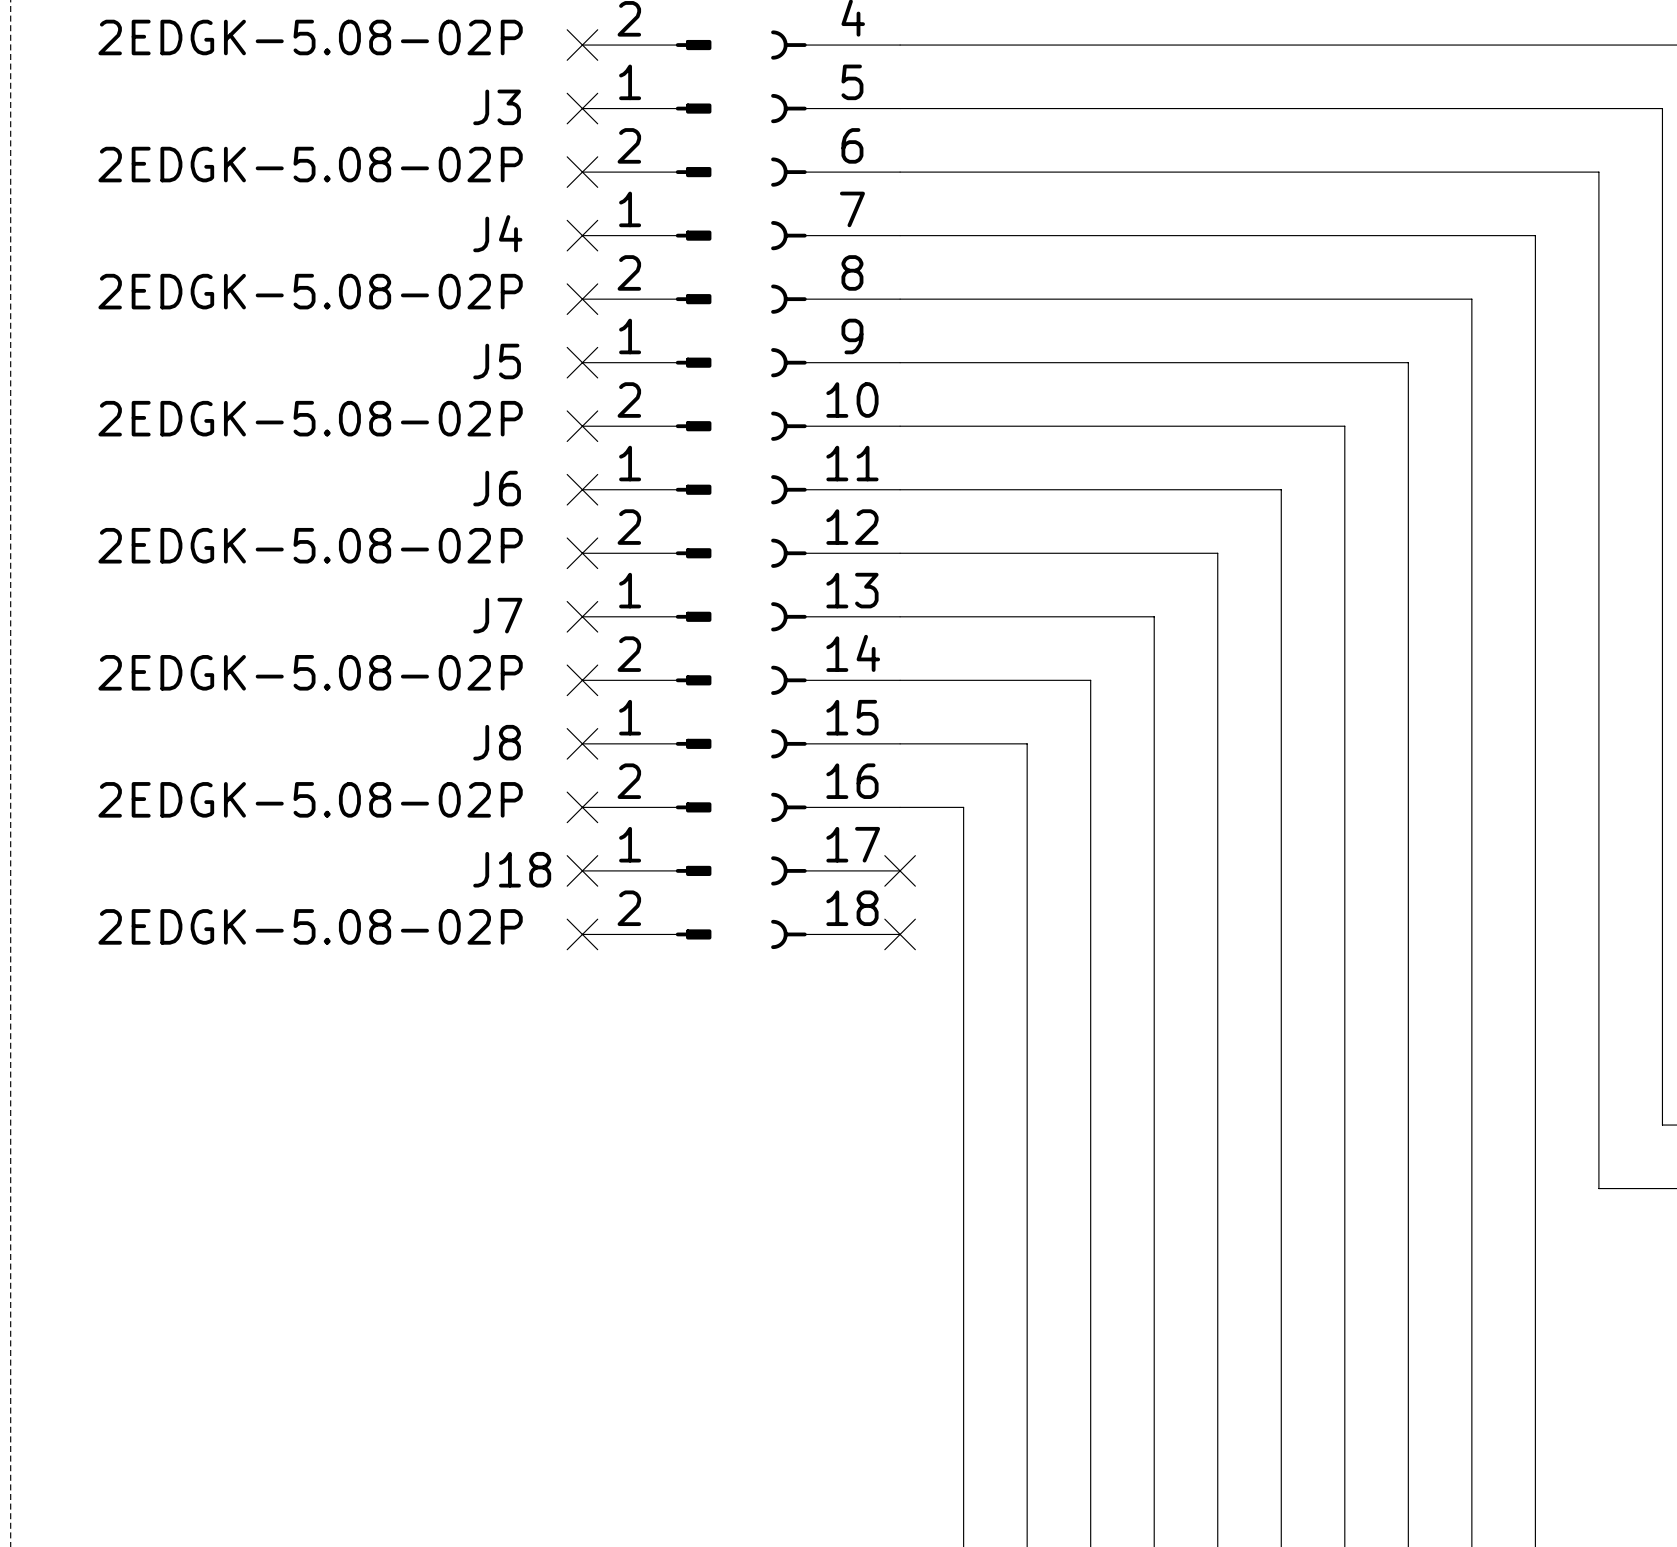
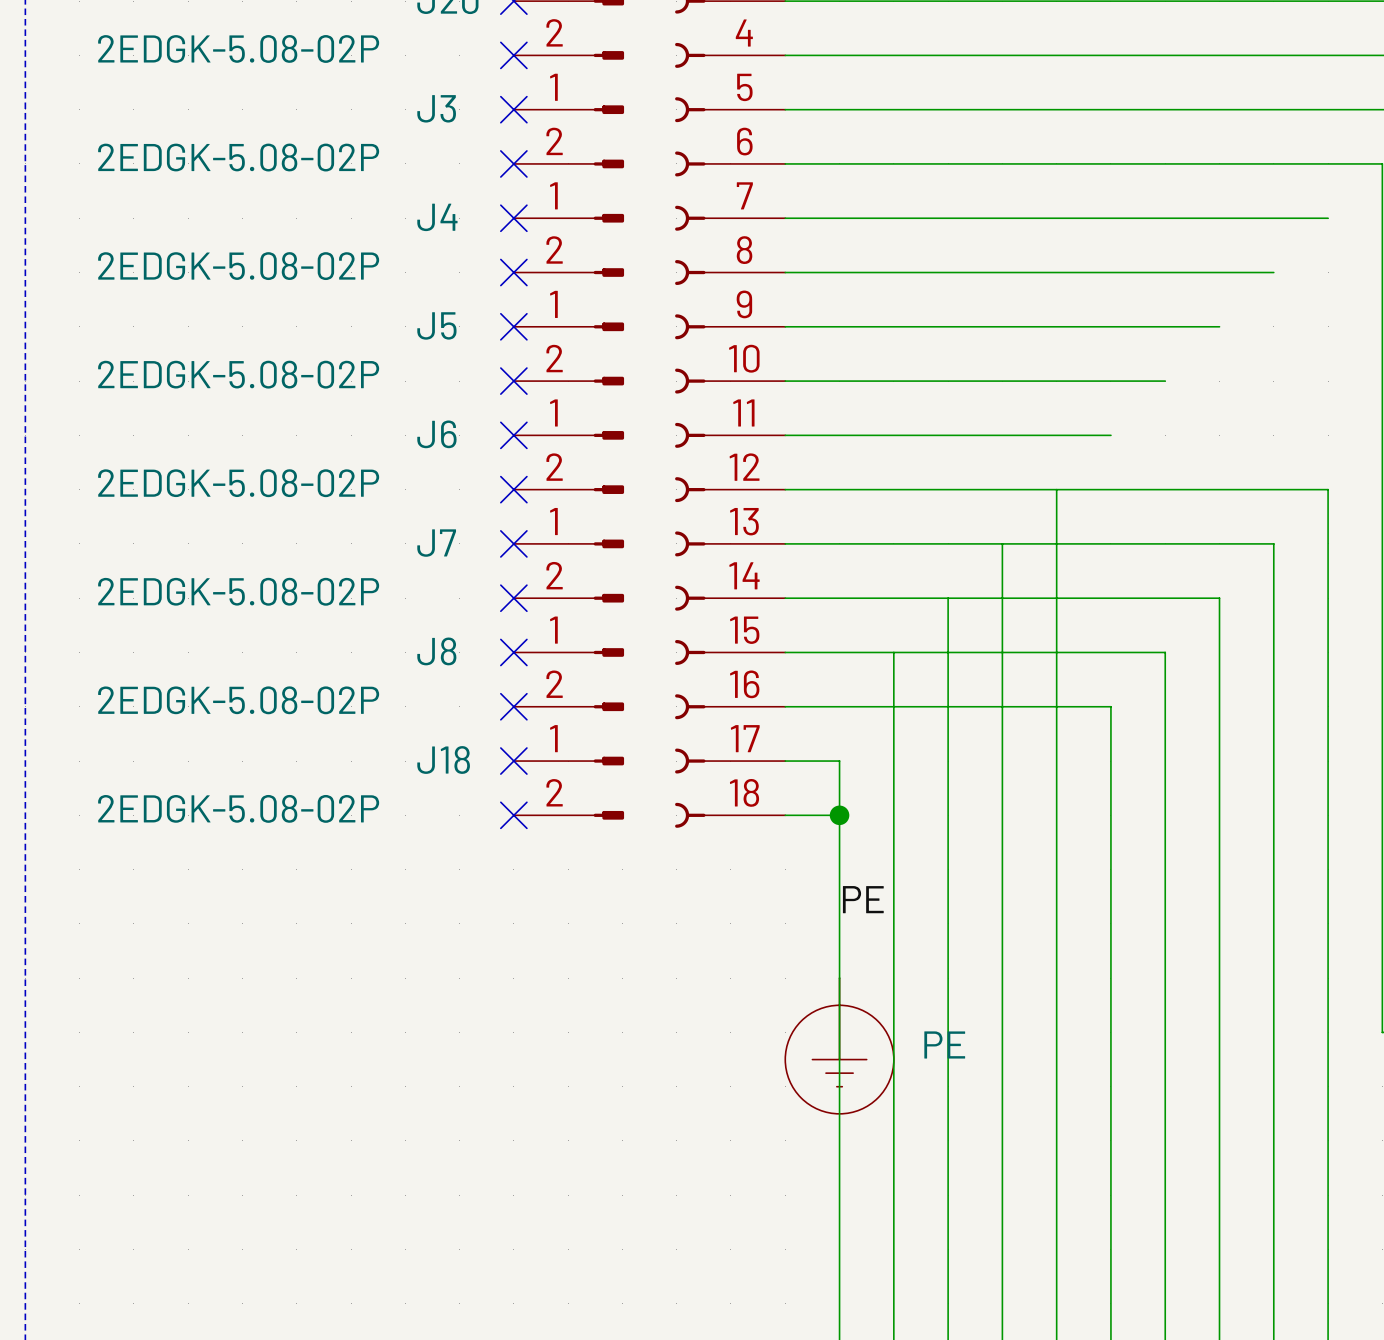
wire: (1535, 235) (1535, 553) -> (1056, 489) (1328, 489)
wire: (1471, 299) (1471, 616) -> (1002, 543) (1273, 543)
wire: (1408, 362) (1408, 680) -> (948, 598) (1219, 598)
wire: (1344, 426) (1344, 743) -> (893, 652) (1165, 652)
wire: (1281, 489) (1281, 807) -> (839, 706) (1110, 706)
wire: (963, 807) (963, 870) -> (785, 761) (839, 761)
no-connect mark: (900, 870) -> none
wire: none -> (785, 815) (839, 815)
no-connect mark: (900, 934) -> none
junction: none -> (839, 815)
label: none -> PE (863, 899)
part: none -> PE (839, 1046)

